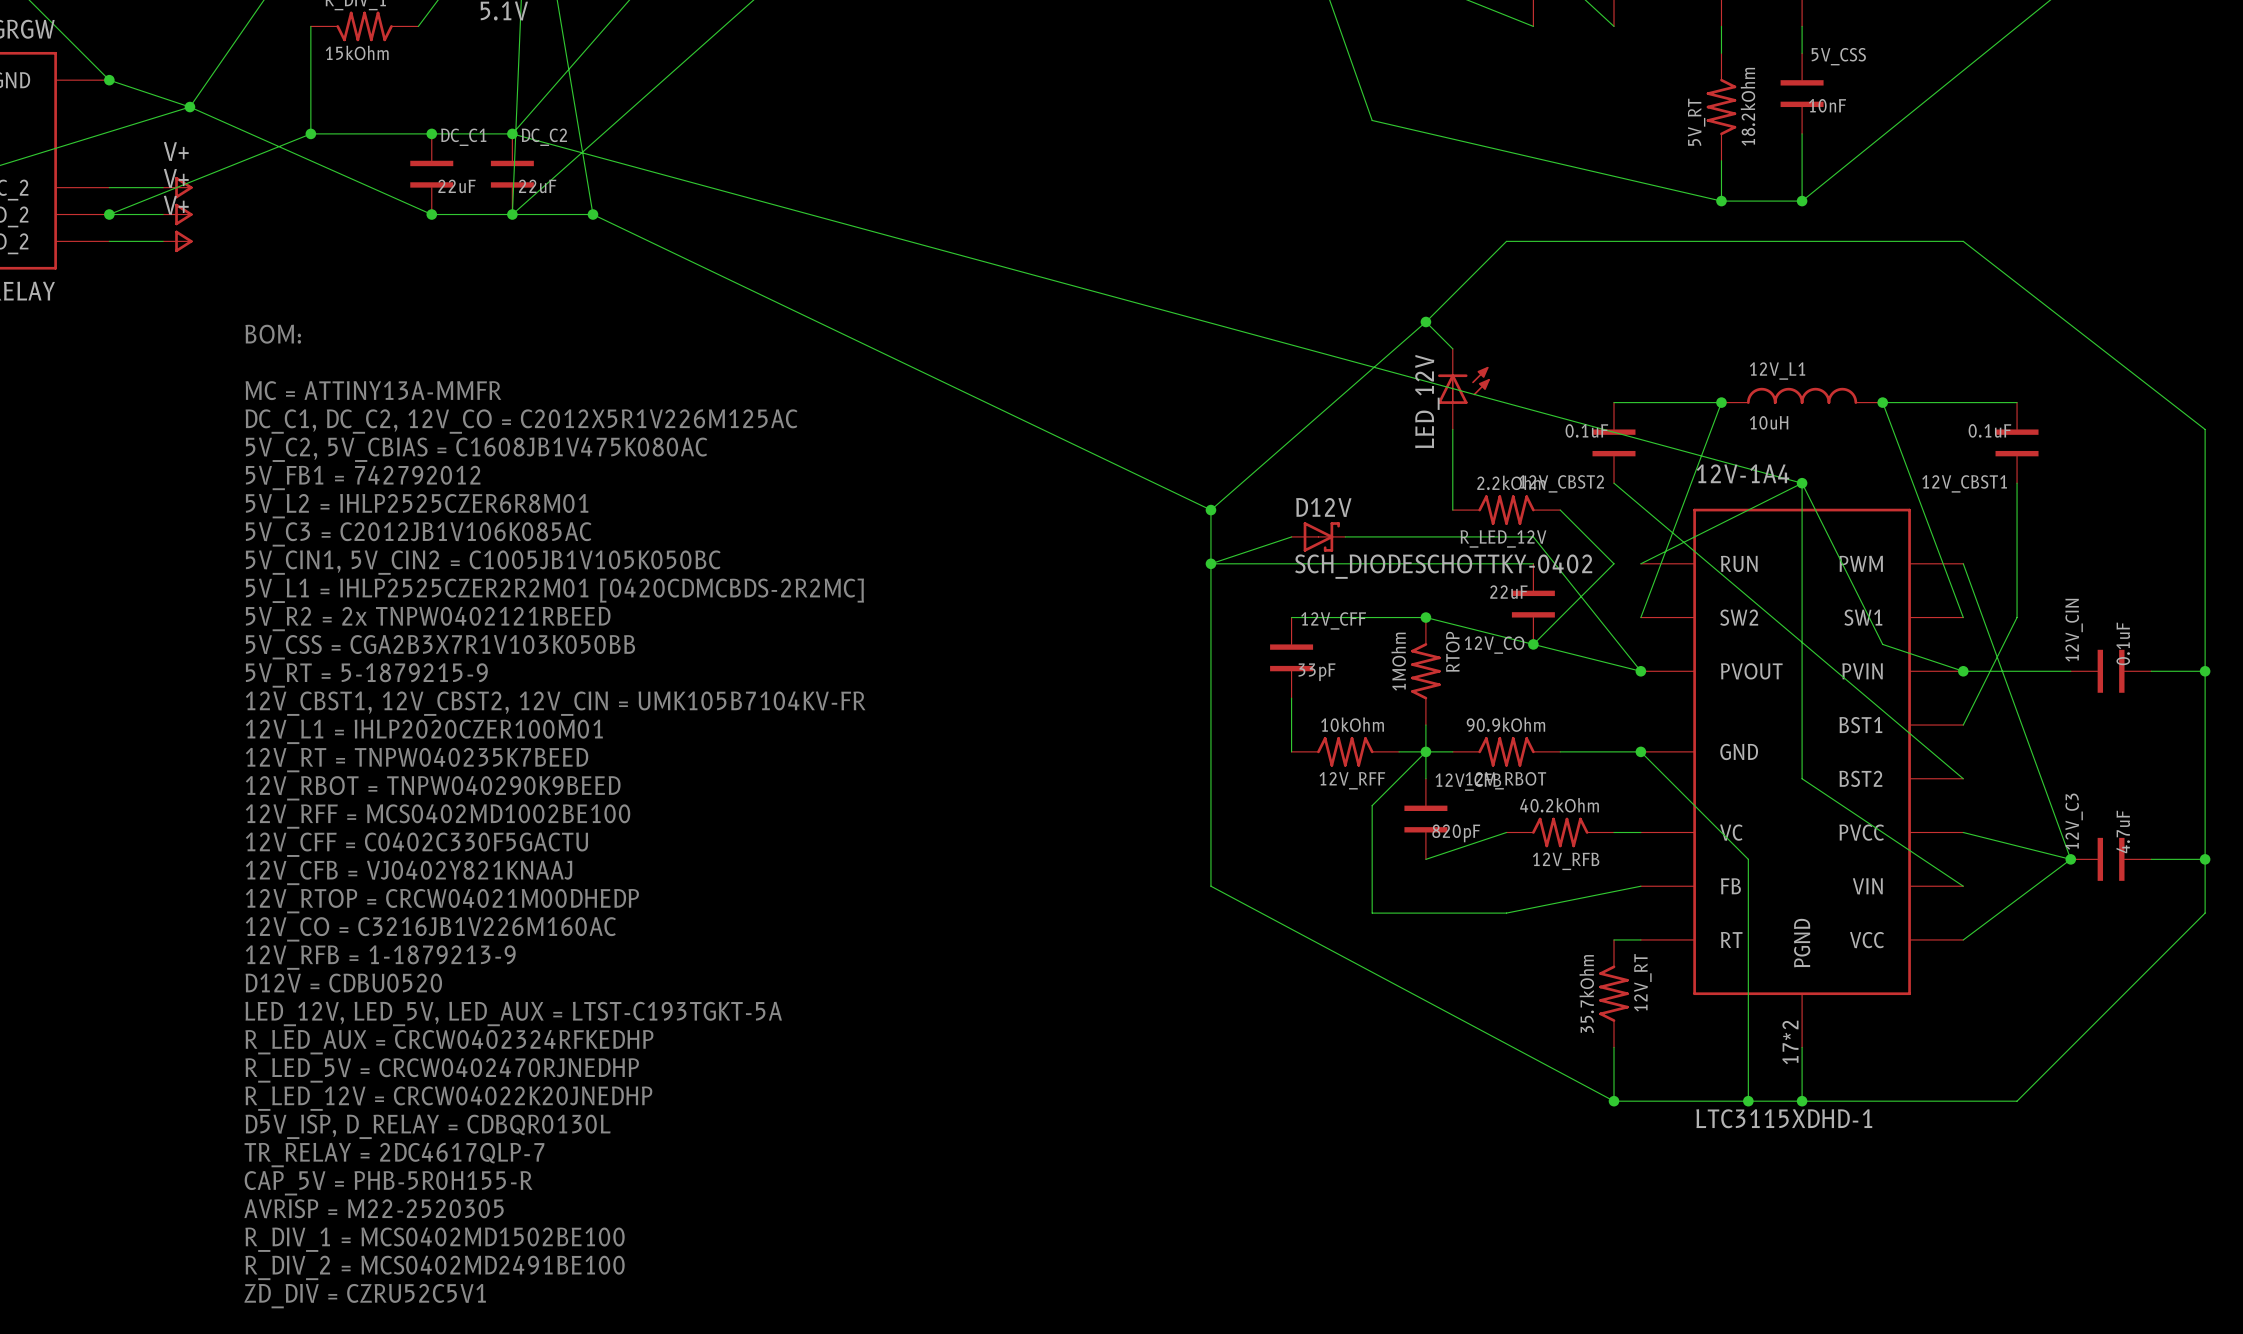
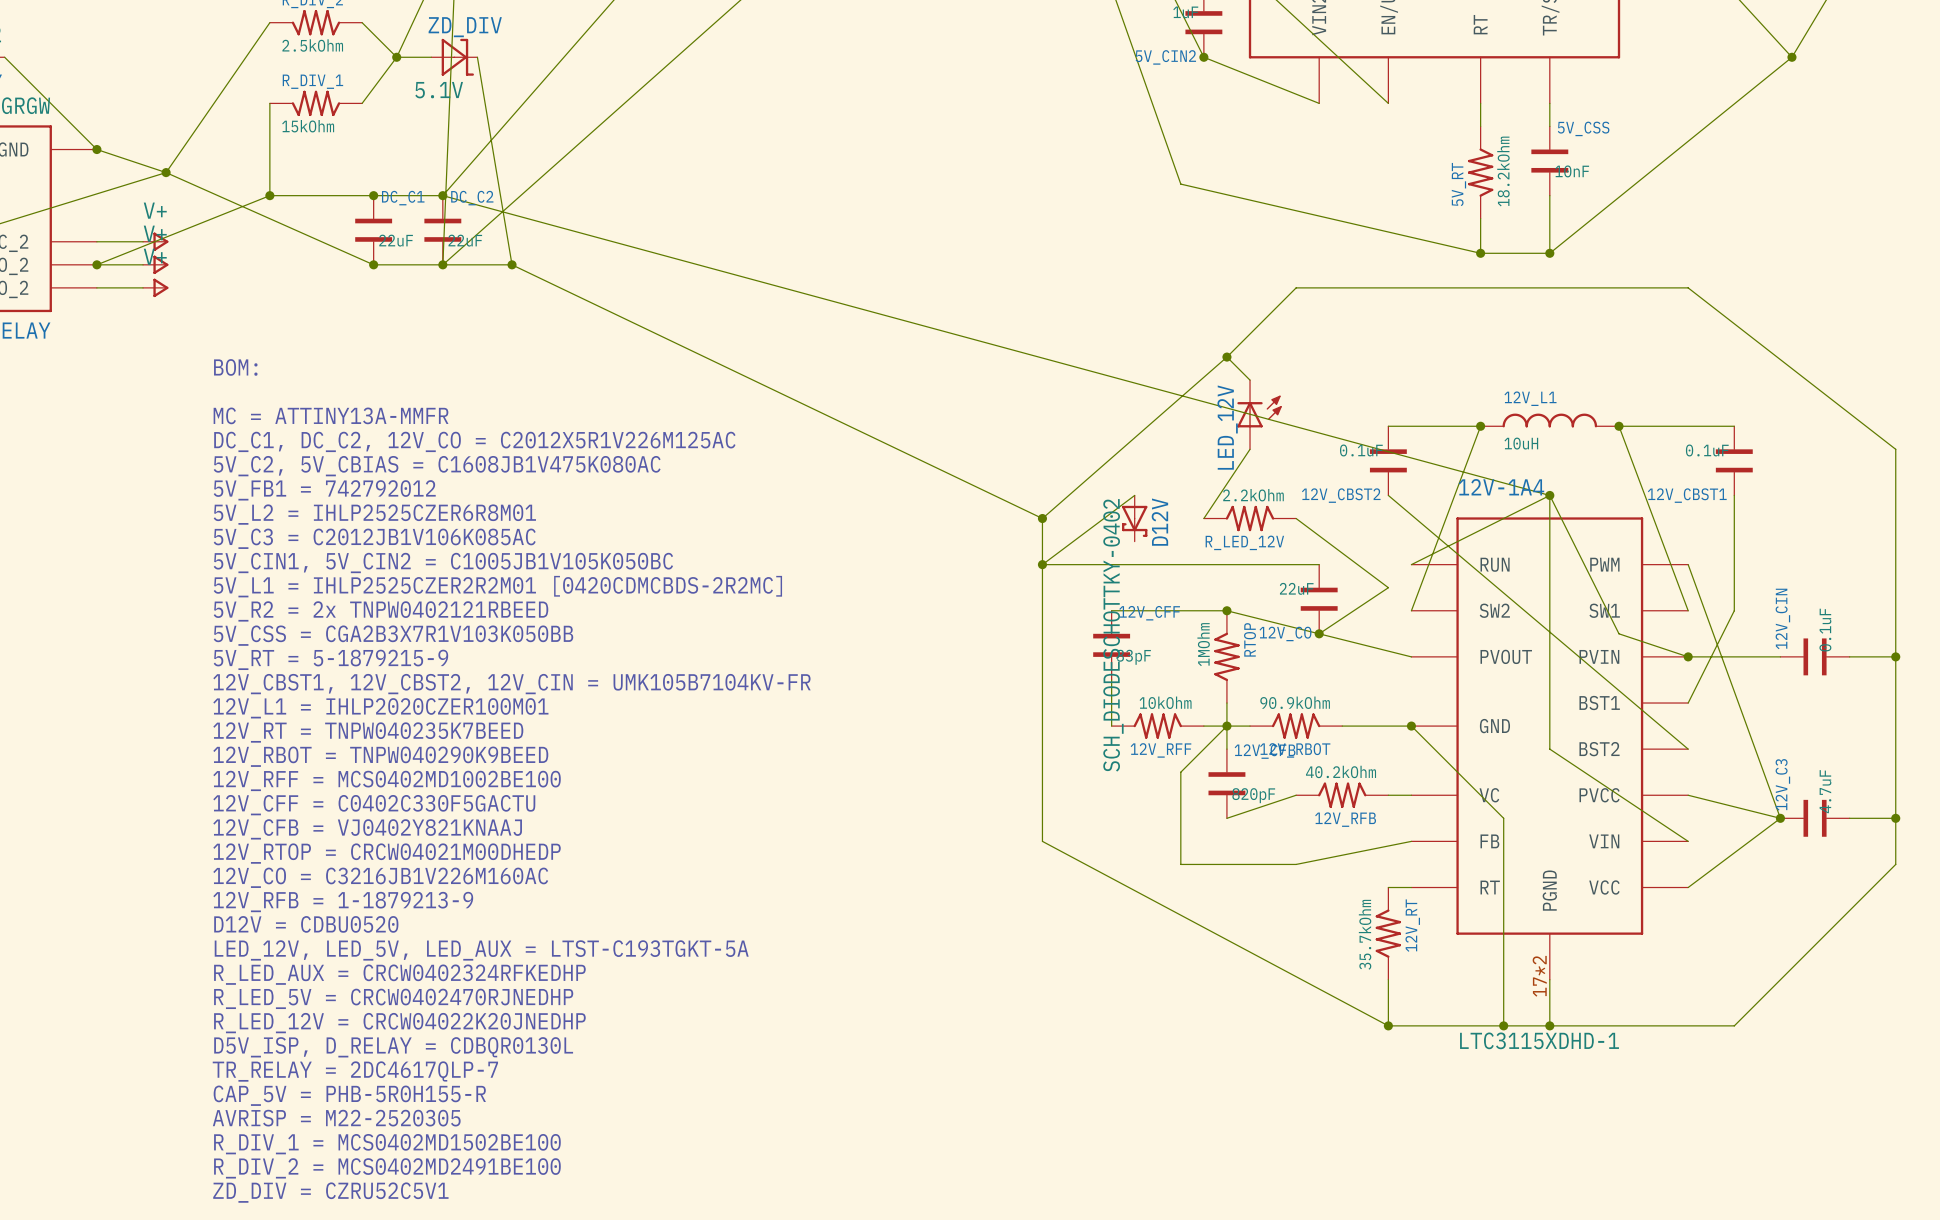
wire: (1452, 429) (1452, 510) -> (1250, 449) (1203, 518)
R_LED_12V position: (1506, 510) -> (1250, 518)
wire: (1560, 510) (1614, 563) (1533, 644) -> (1296, 518) (1388, 587) (1319, 633)
wire: (1291, 536) (1210, 563) -> (1134, 495) (1042, 564)
D12V rotation: 0° (1321, 536) -> 90° clockwise (1134, 521)
wire: (1345, 536) (1533, 536) (1640, 671) -> none
junction: (1640, 671) -> none

